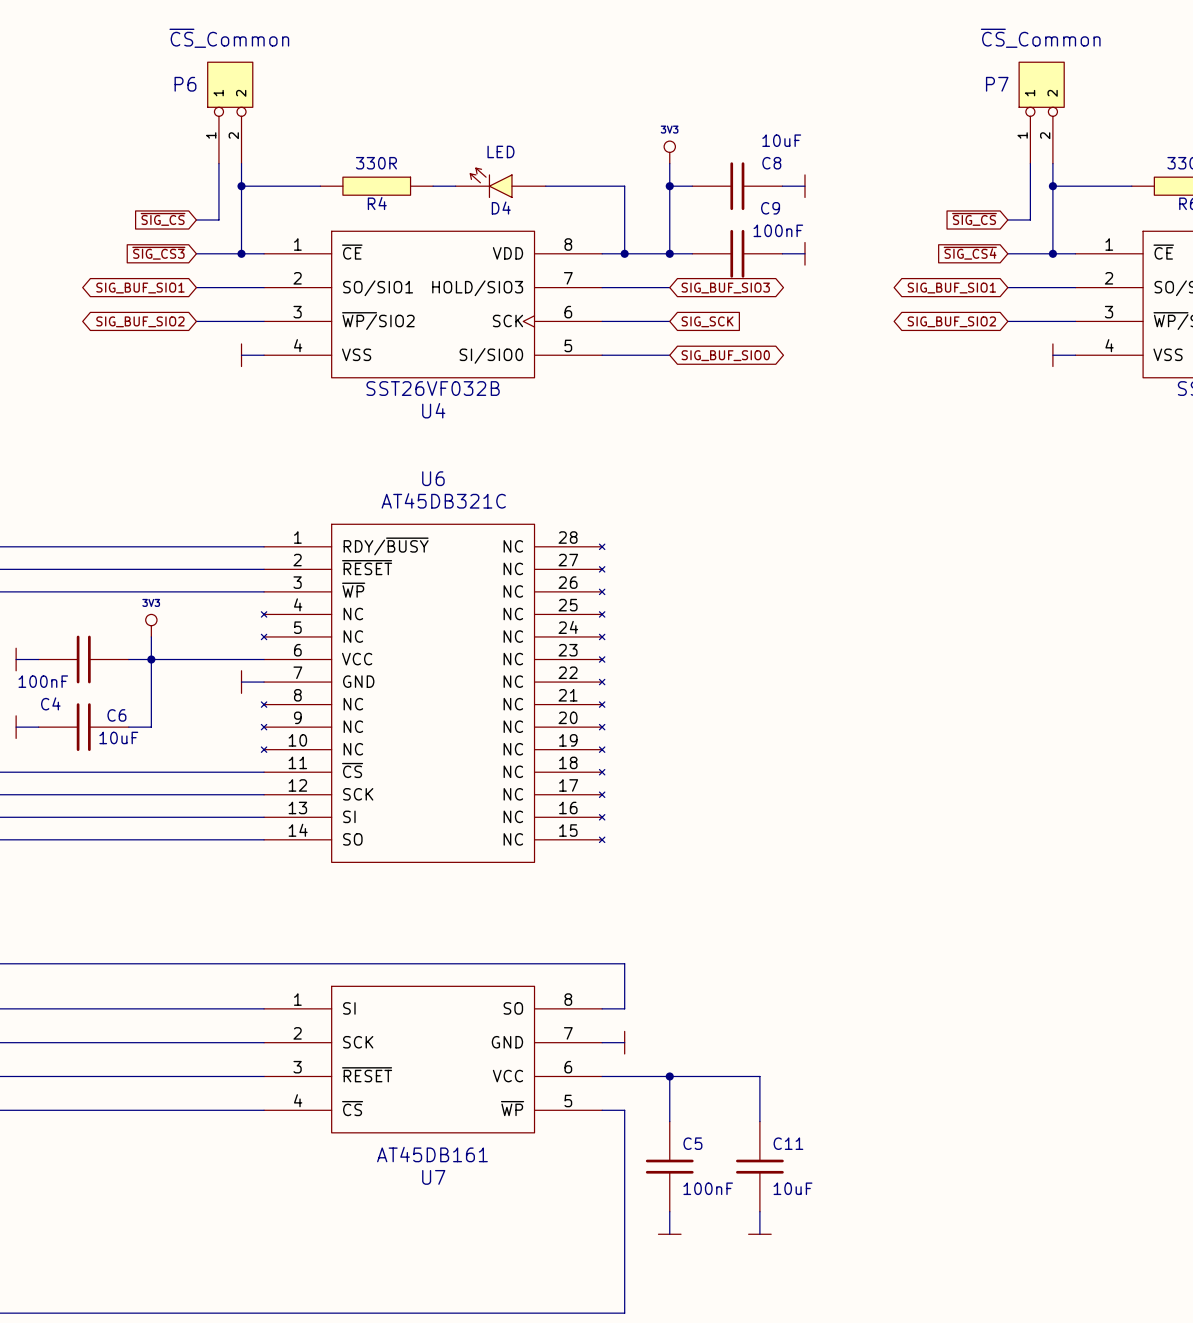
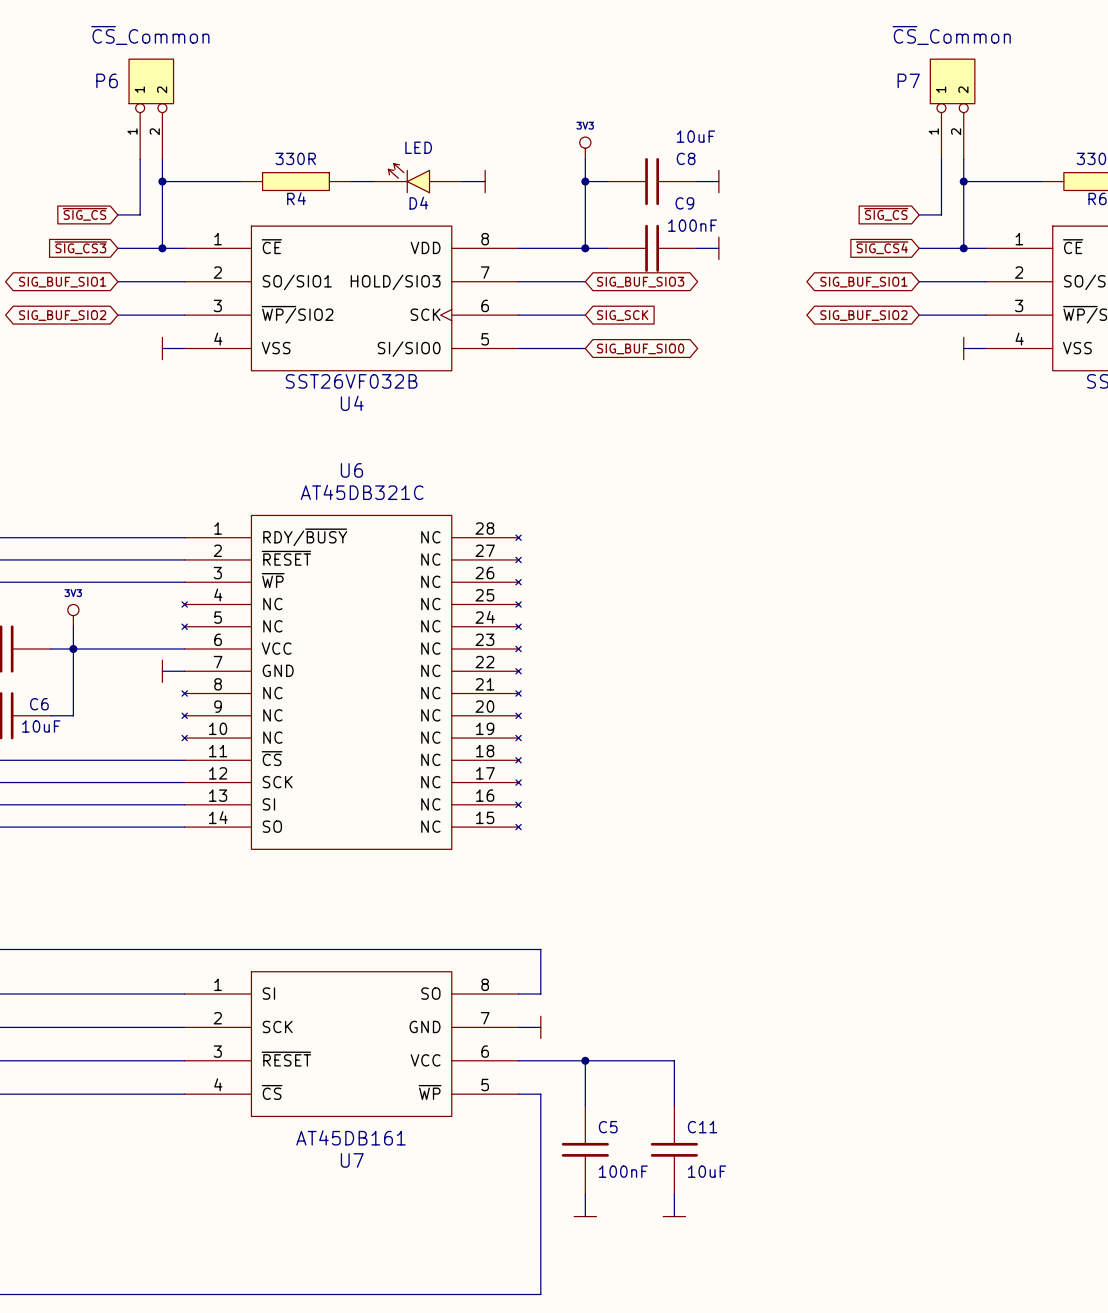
wire: (568, 186) (624, 186) (624, 253) -> none
power symbol: none -> (485, 181)
junction: (624, 253) -> none

